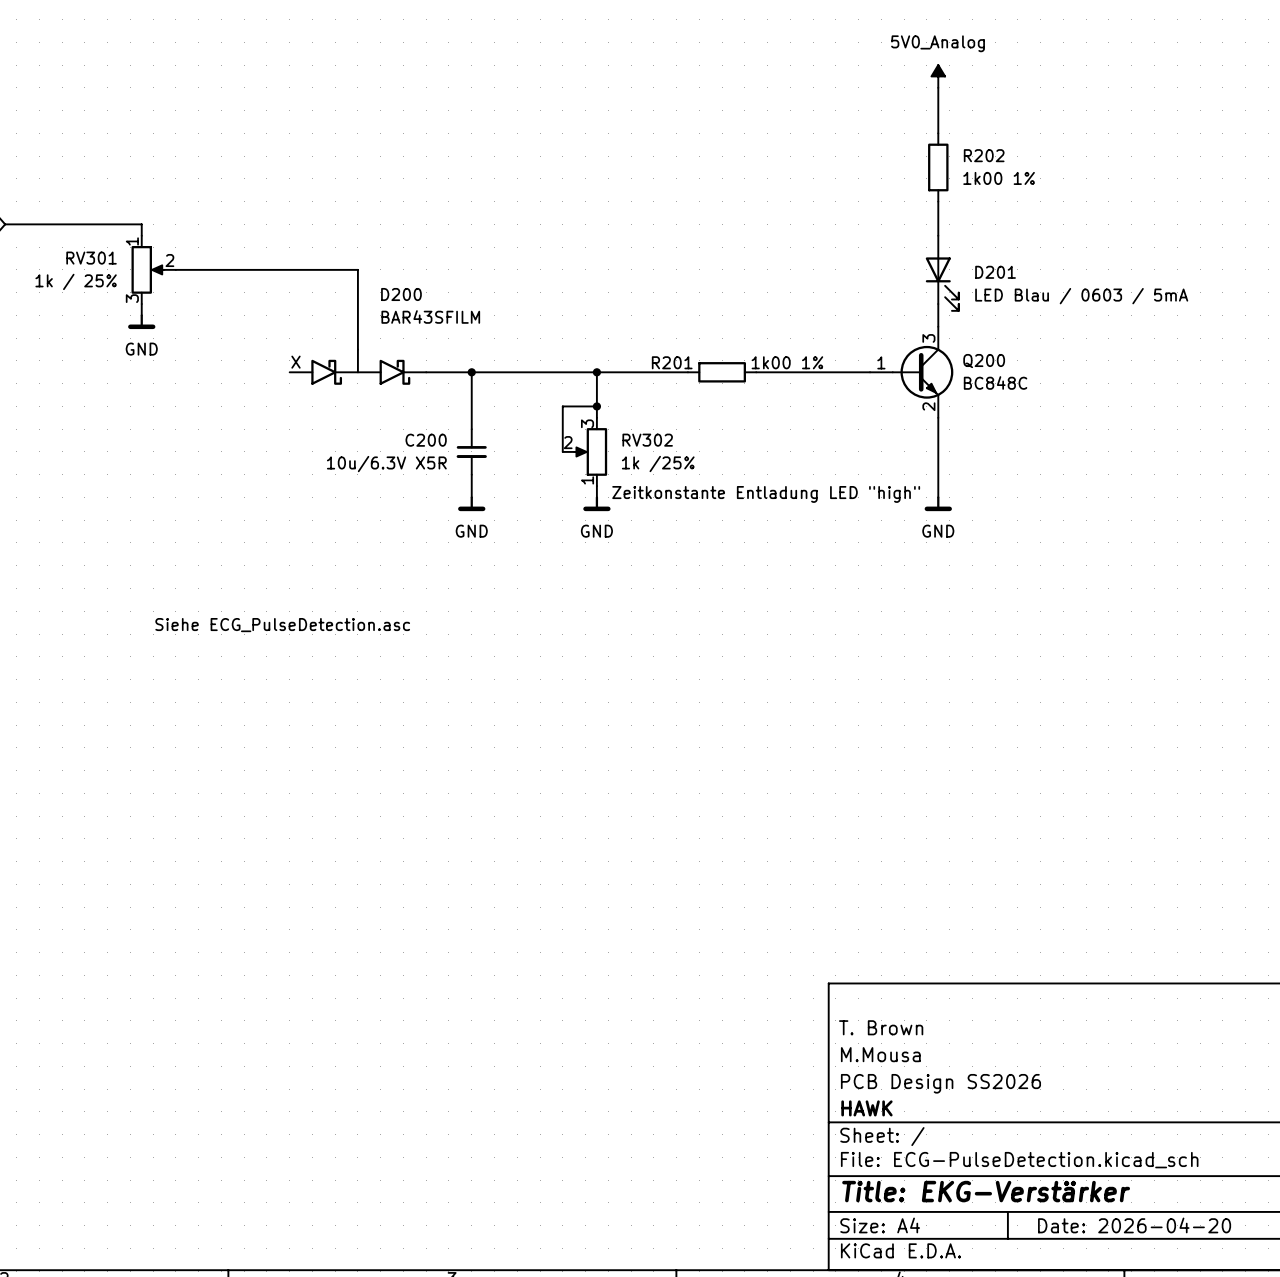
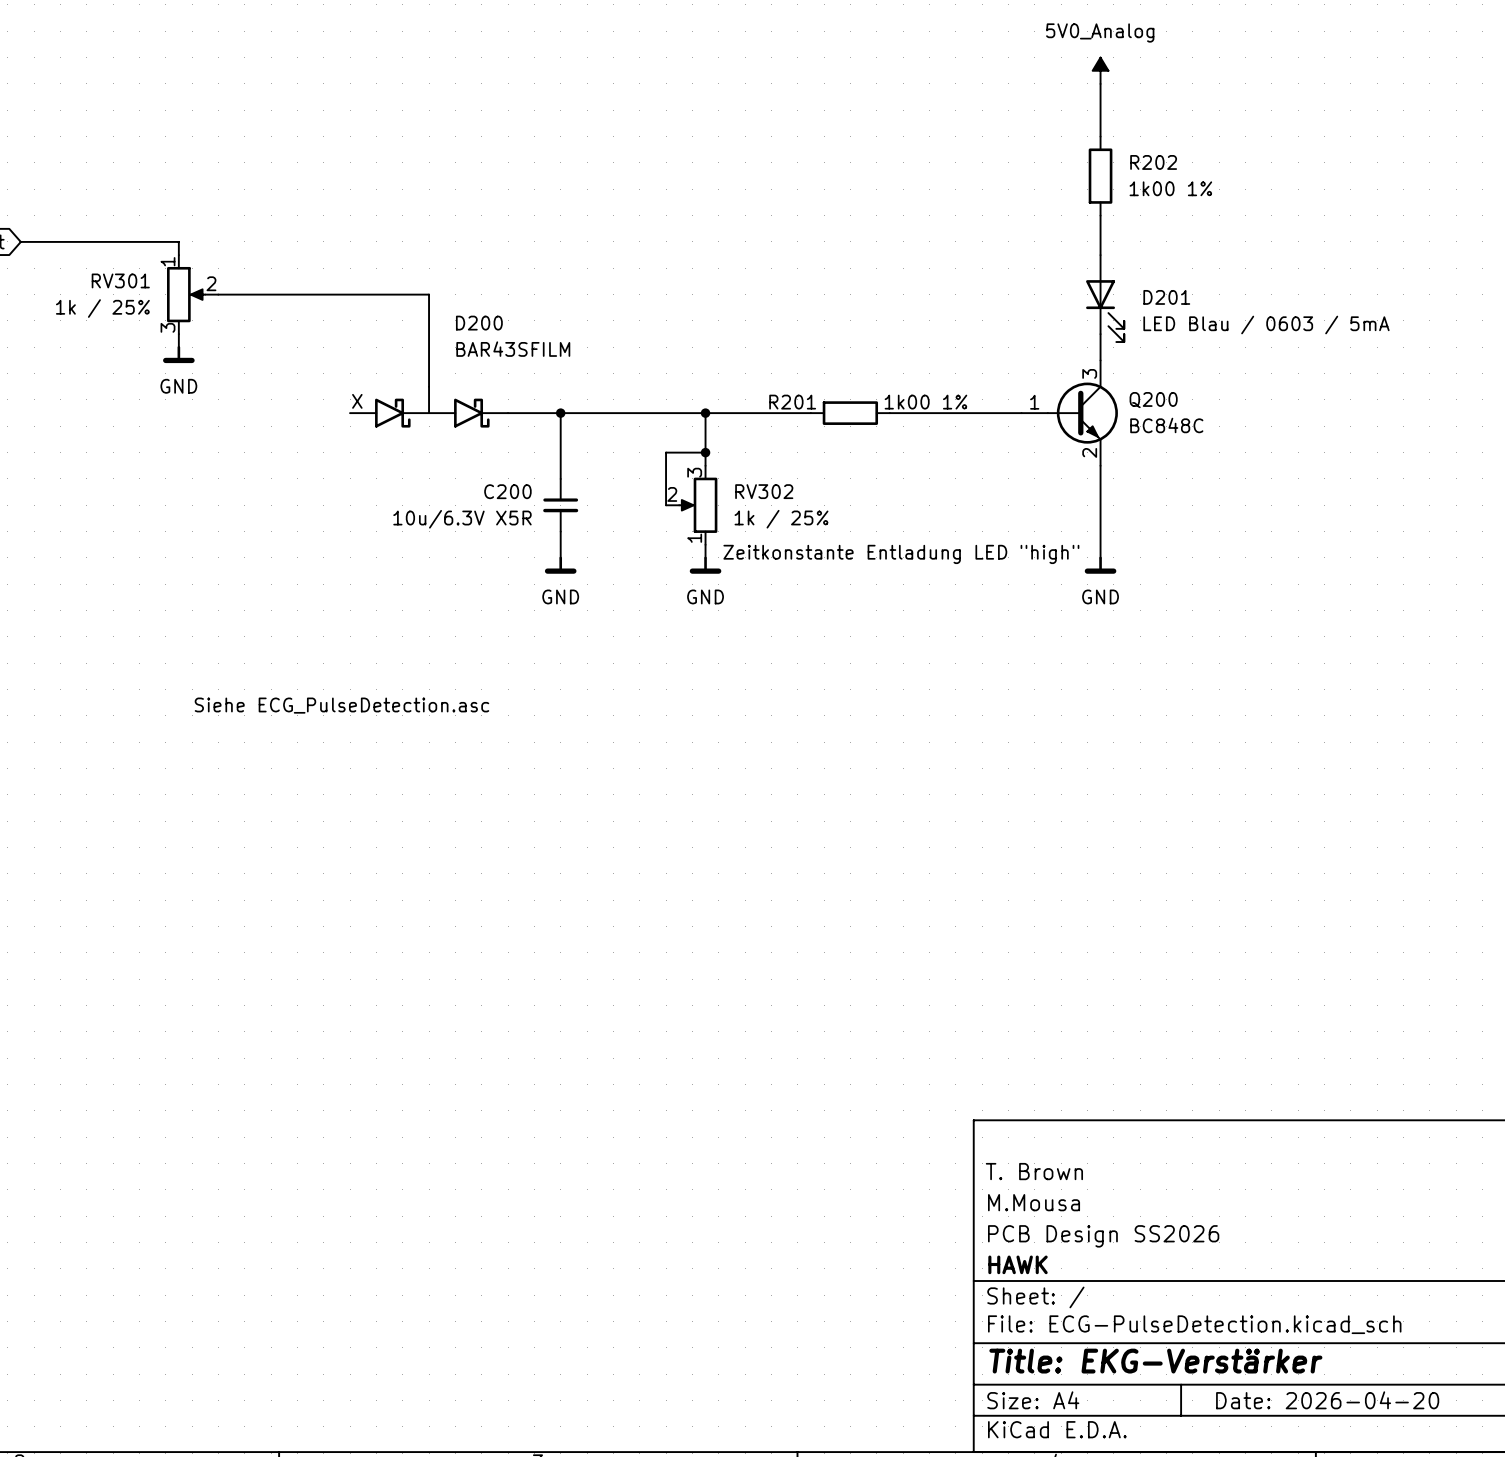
RV302 value: 1k /25% (658, 463) -> 1k / 25% (781, 519)

